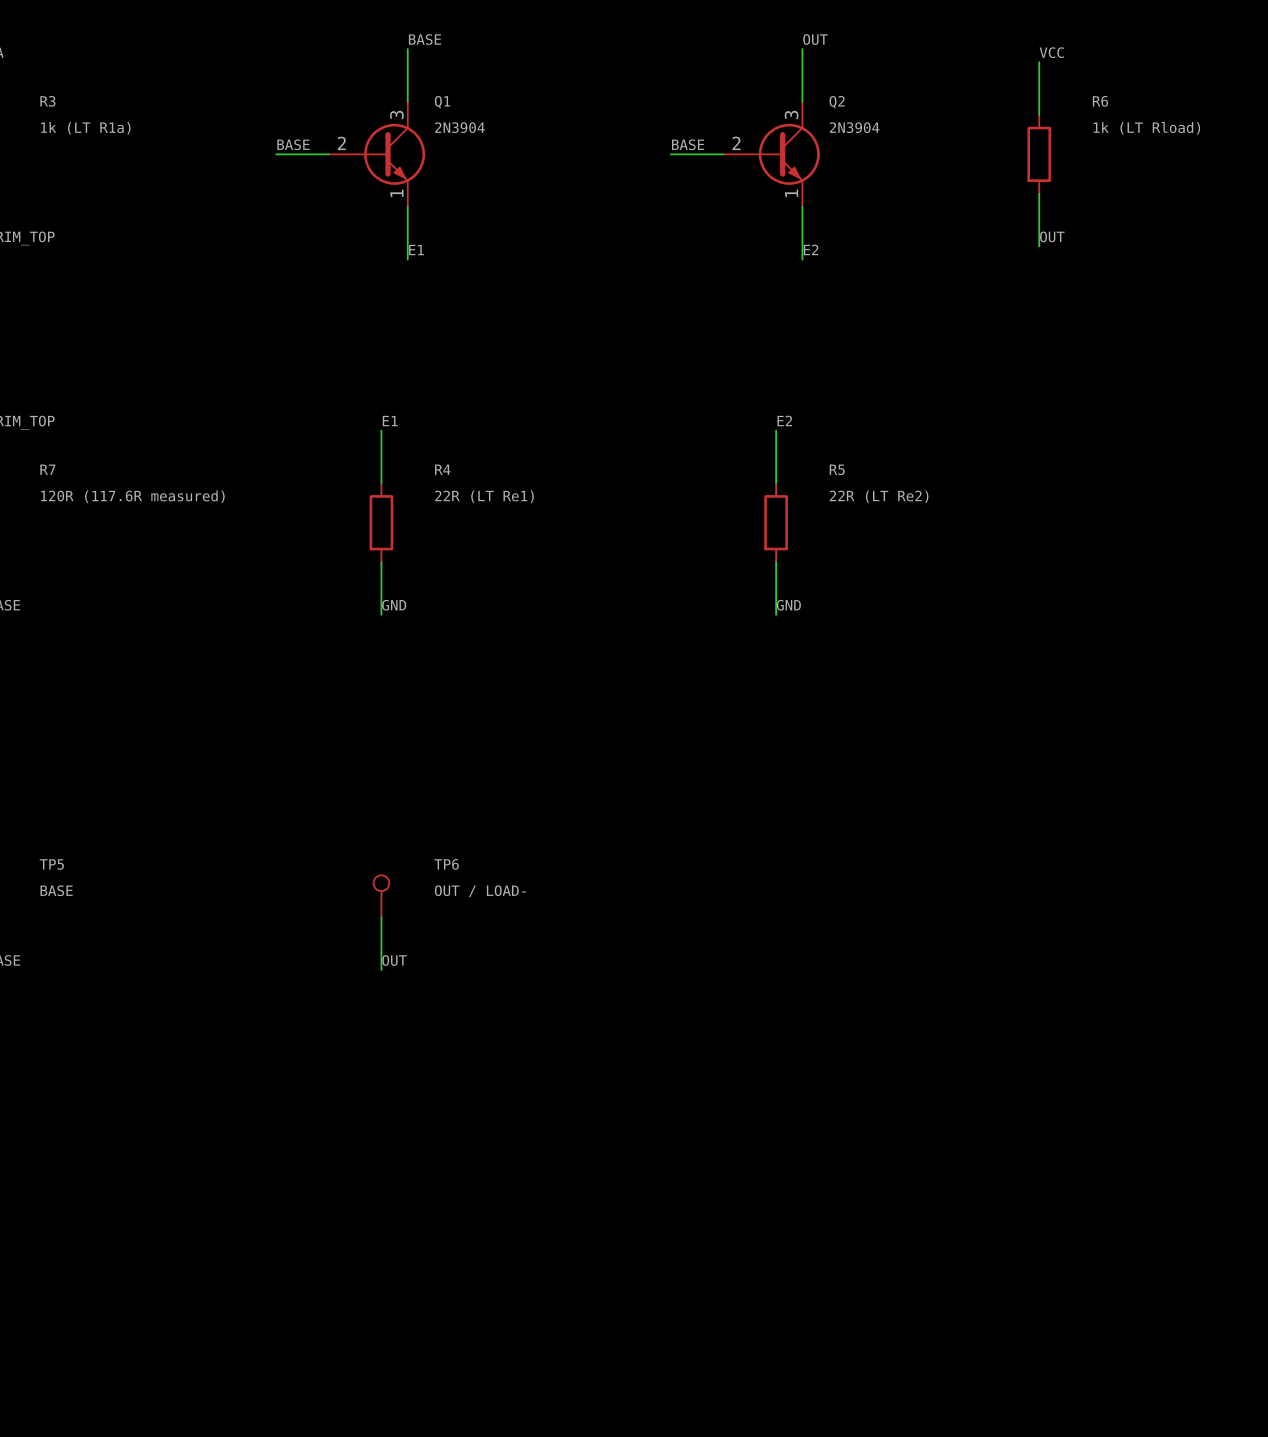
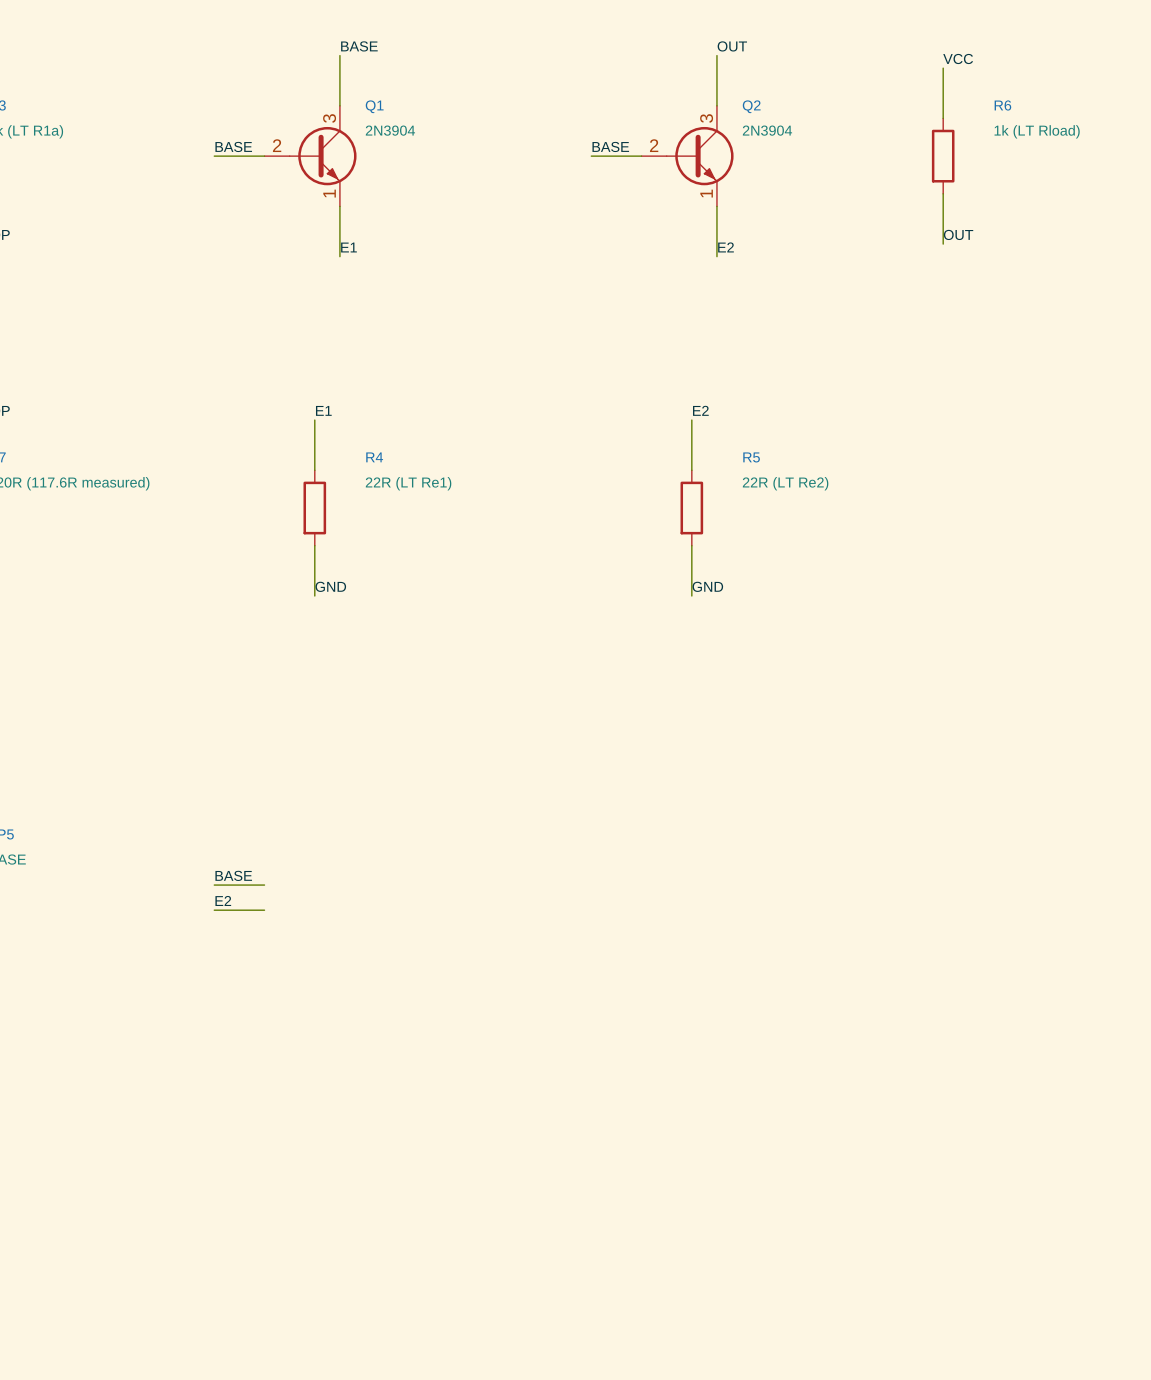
TP6: OUT / LOAD- (381, 896) -> none
label: none -> BASE (233, 875)
wire: none -> (214, 885) (264, 885)
wire: (381, 917) (381, 970) -> none
label: none -> E2 (223, 900)
wire: none -> (214, 910) (264, 910)
label: OUT (394, 960) -> none

